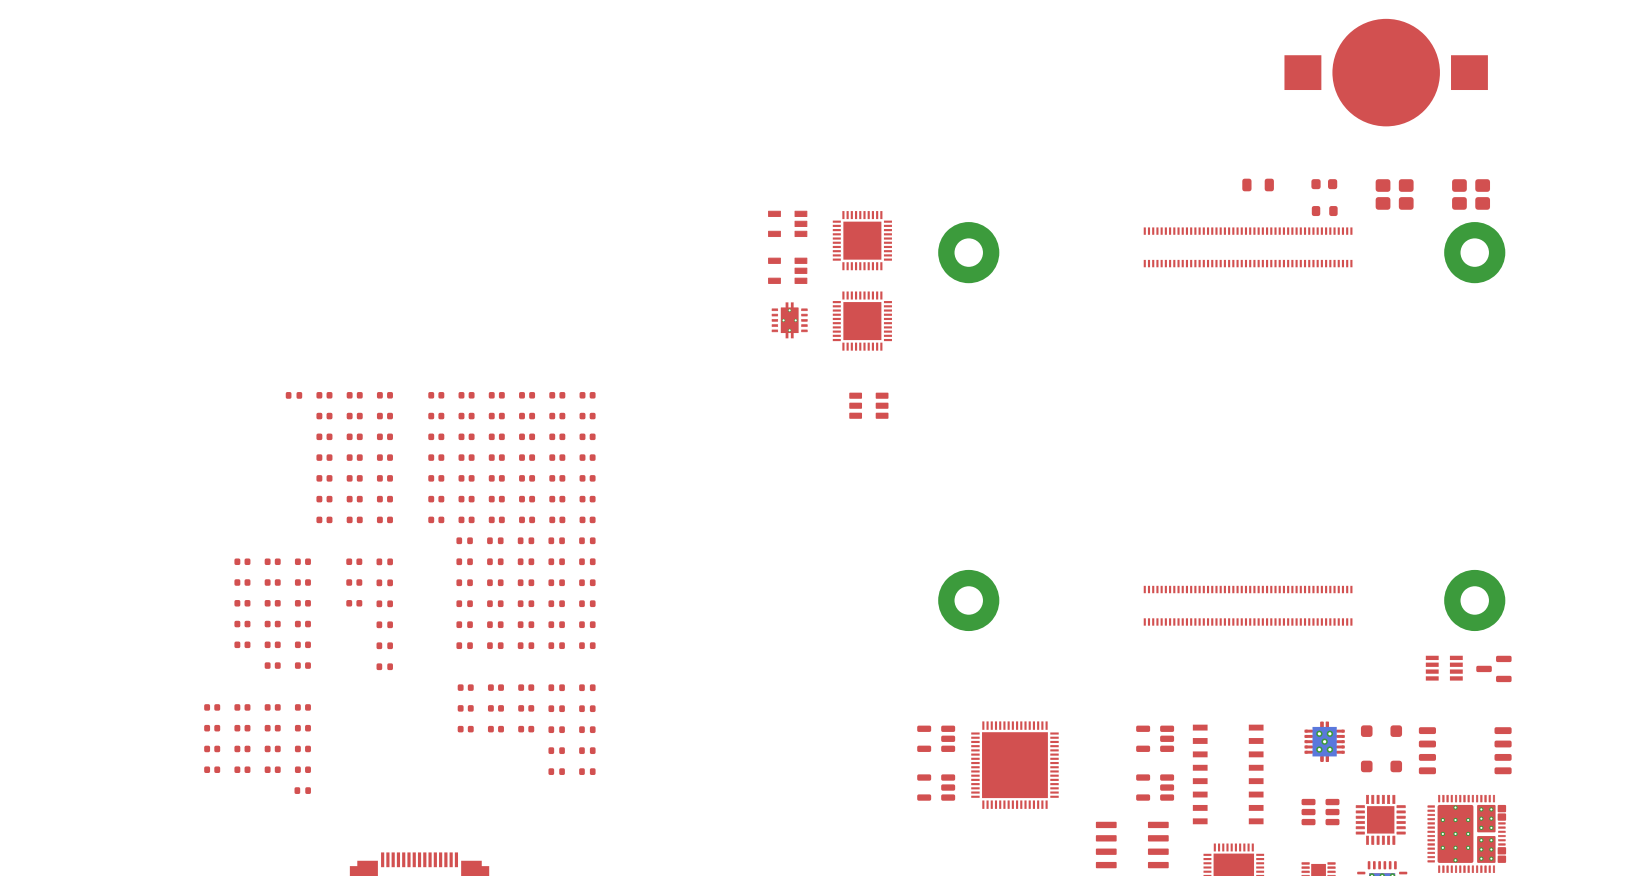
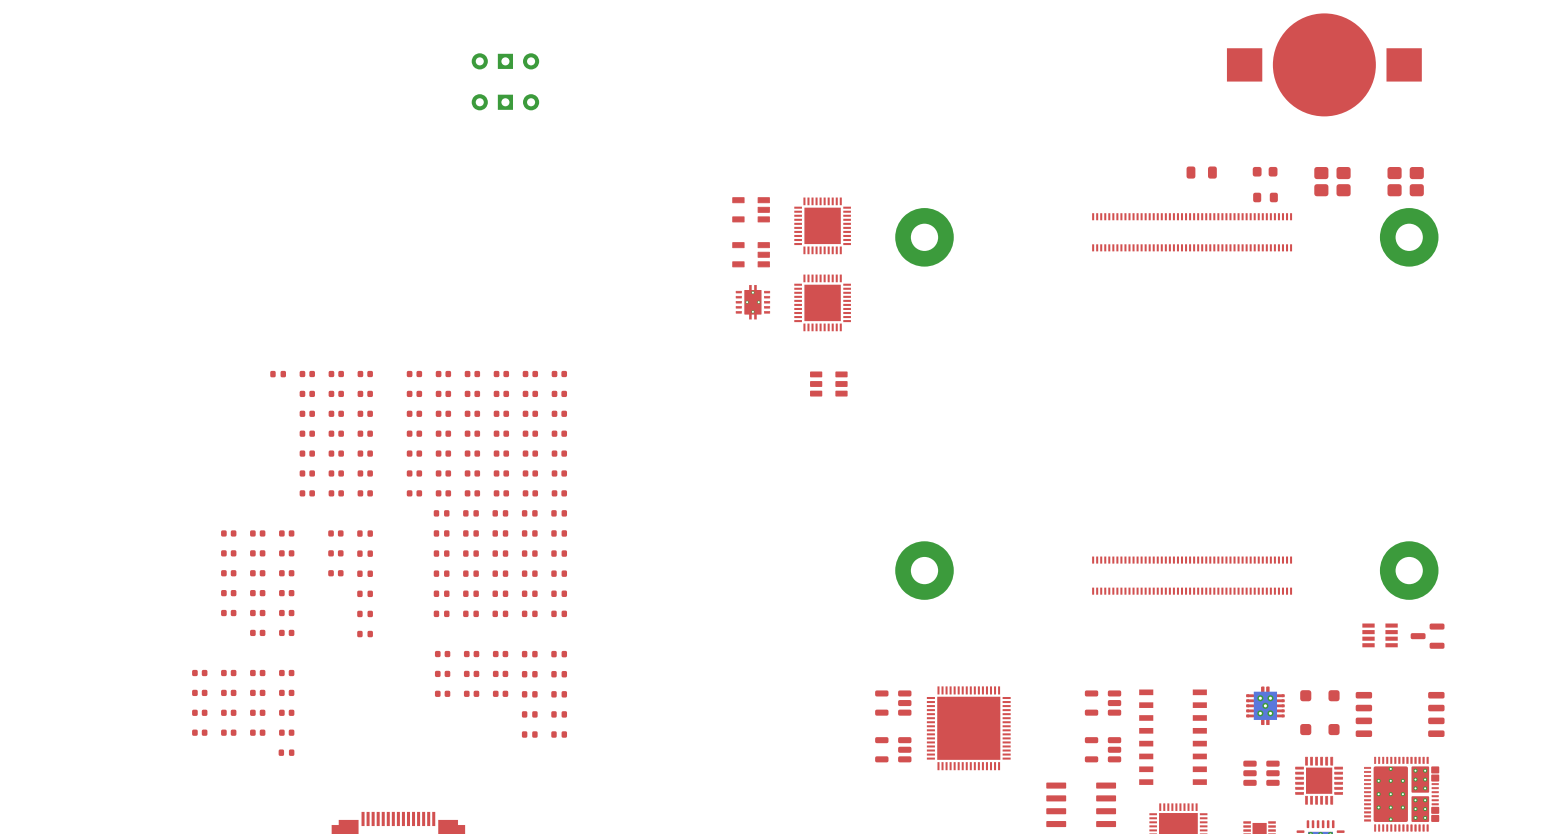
part: none -> (505, 61)
part: none -> (505, 102)

